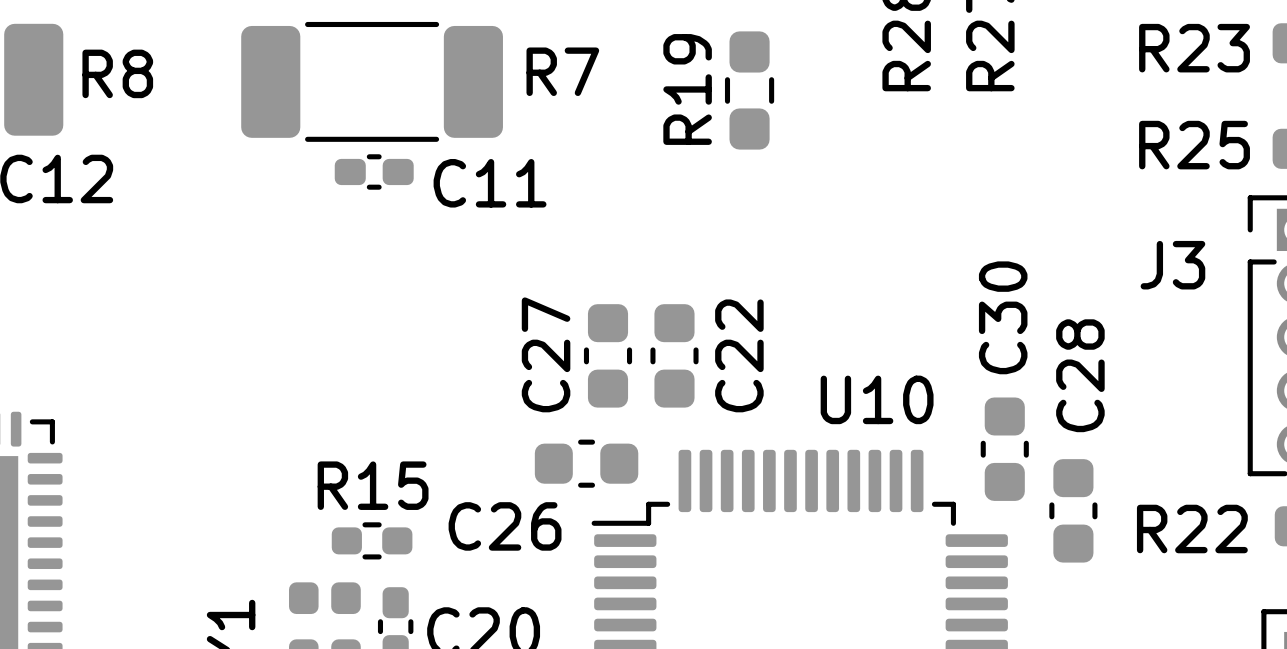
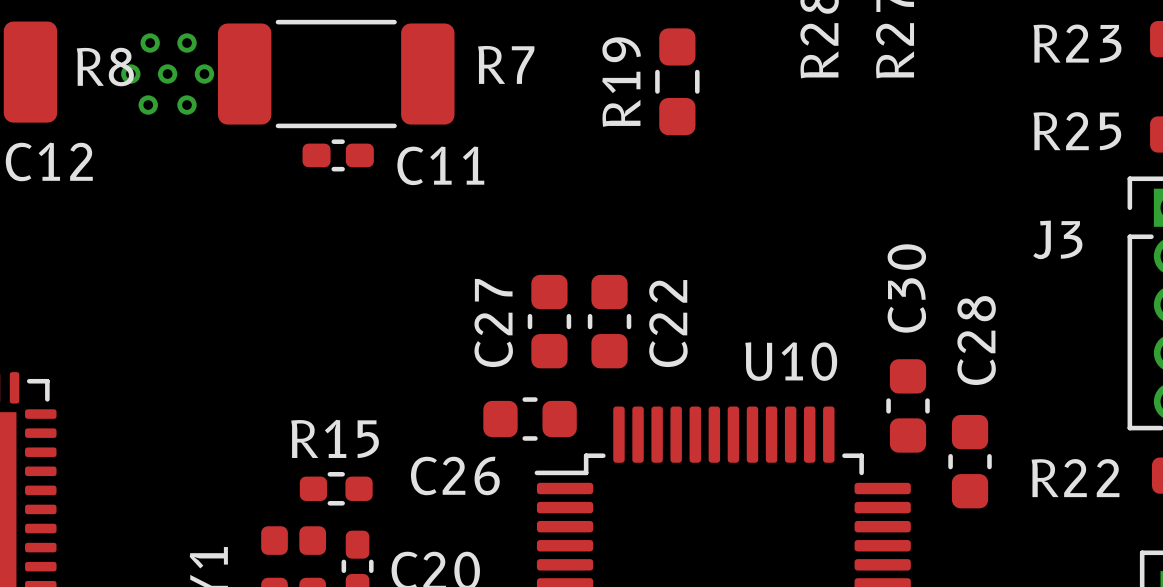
part: none -> (150, 43)
part: none -> (187, 43)
part: none -> (130, 74)
part: none -> (167, 74)
part: none -> (204, 74)
part: none -> (148, 105)
part: none -> (187, 105)

